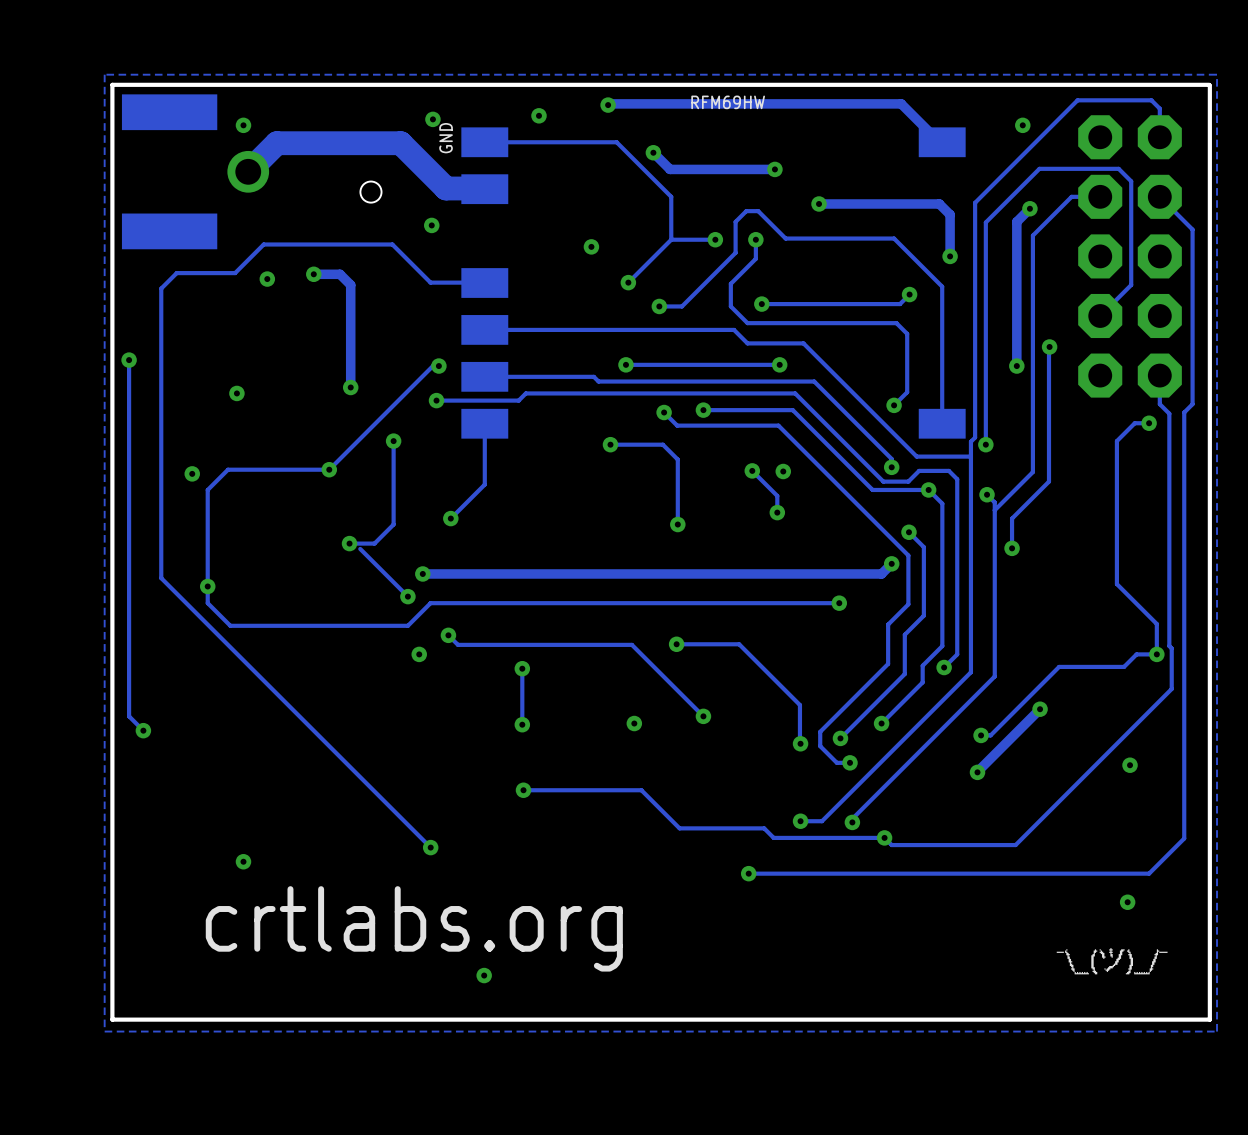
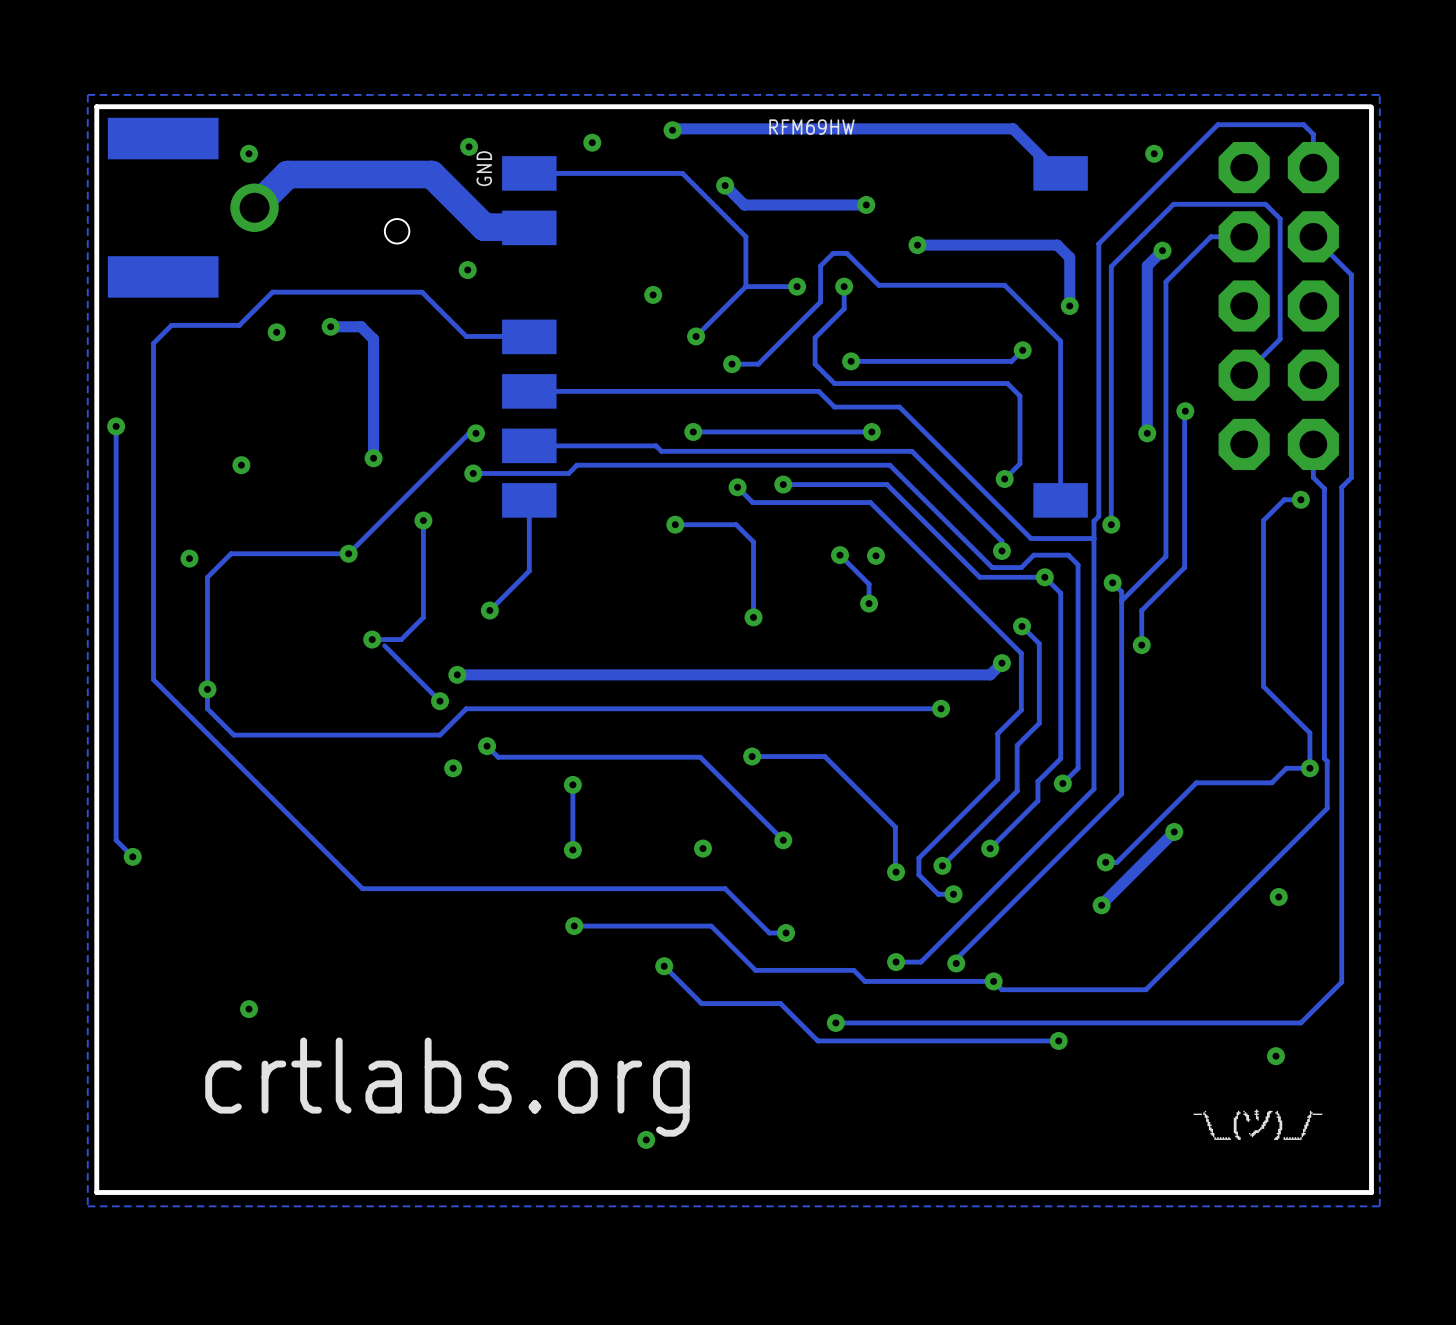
track: (341, 758) (430, 847) -> (362, 888) (725, 888) (769, 932) (786, 932)
via: none -> (786, 932)
track: none -> (664, 966) (701, 1003) (780, 1003) (817, 1040) (1058, 1040)
via: none -> (664, 966)
via: (430, 847) -> none
via: none -> (1058, 1040)
via: none -> (646, 1139)
via: (484, 975) -> none

